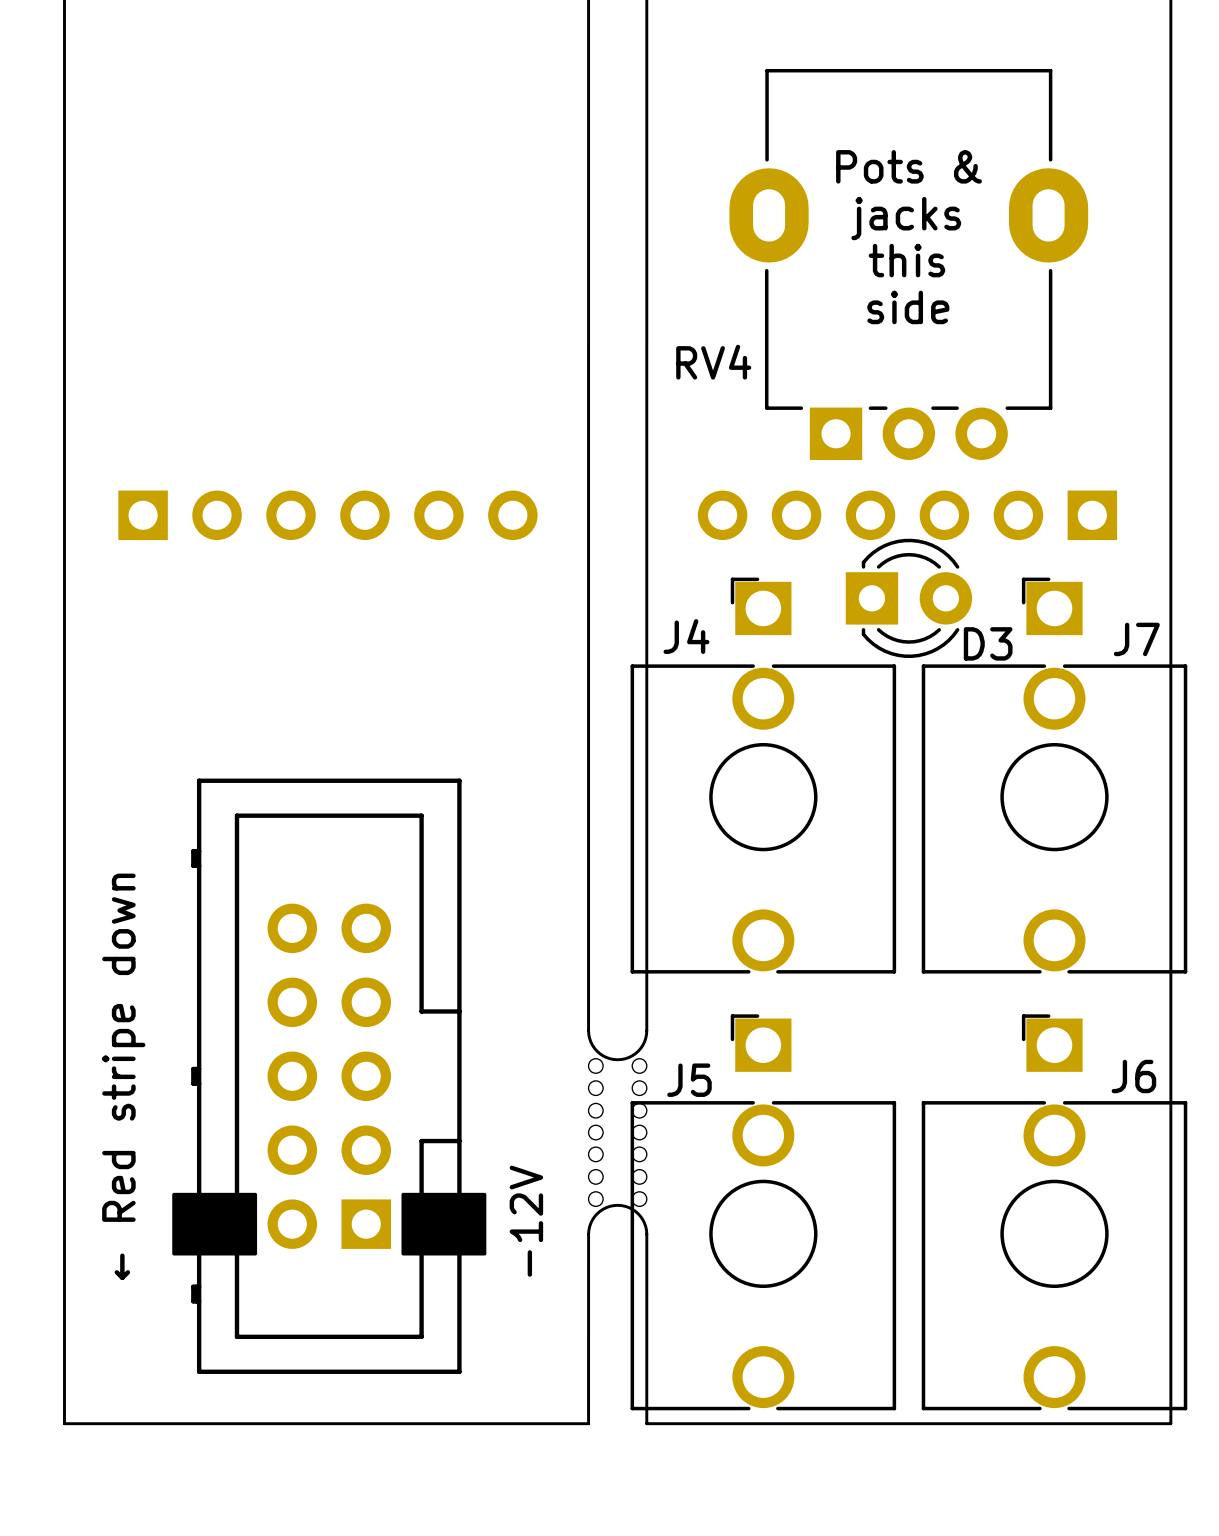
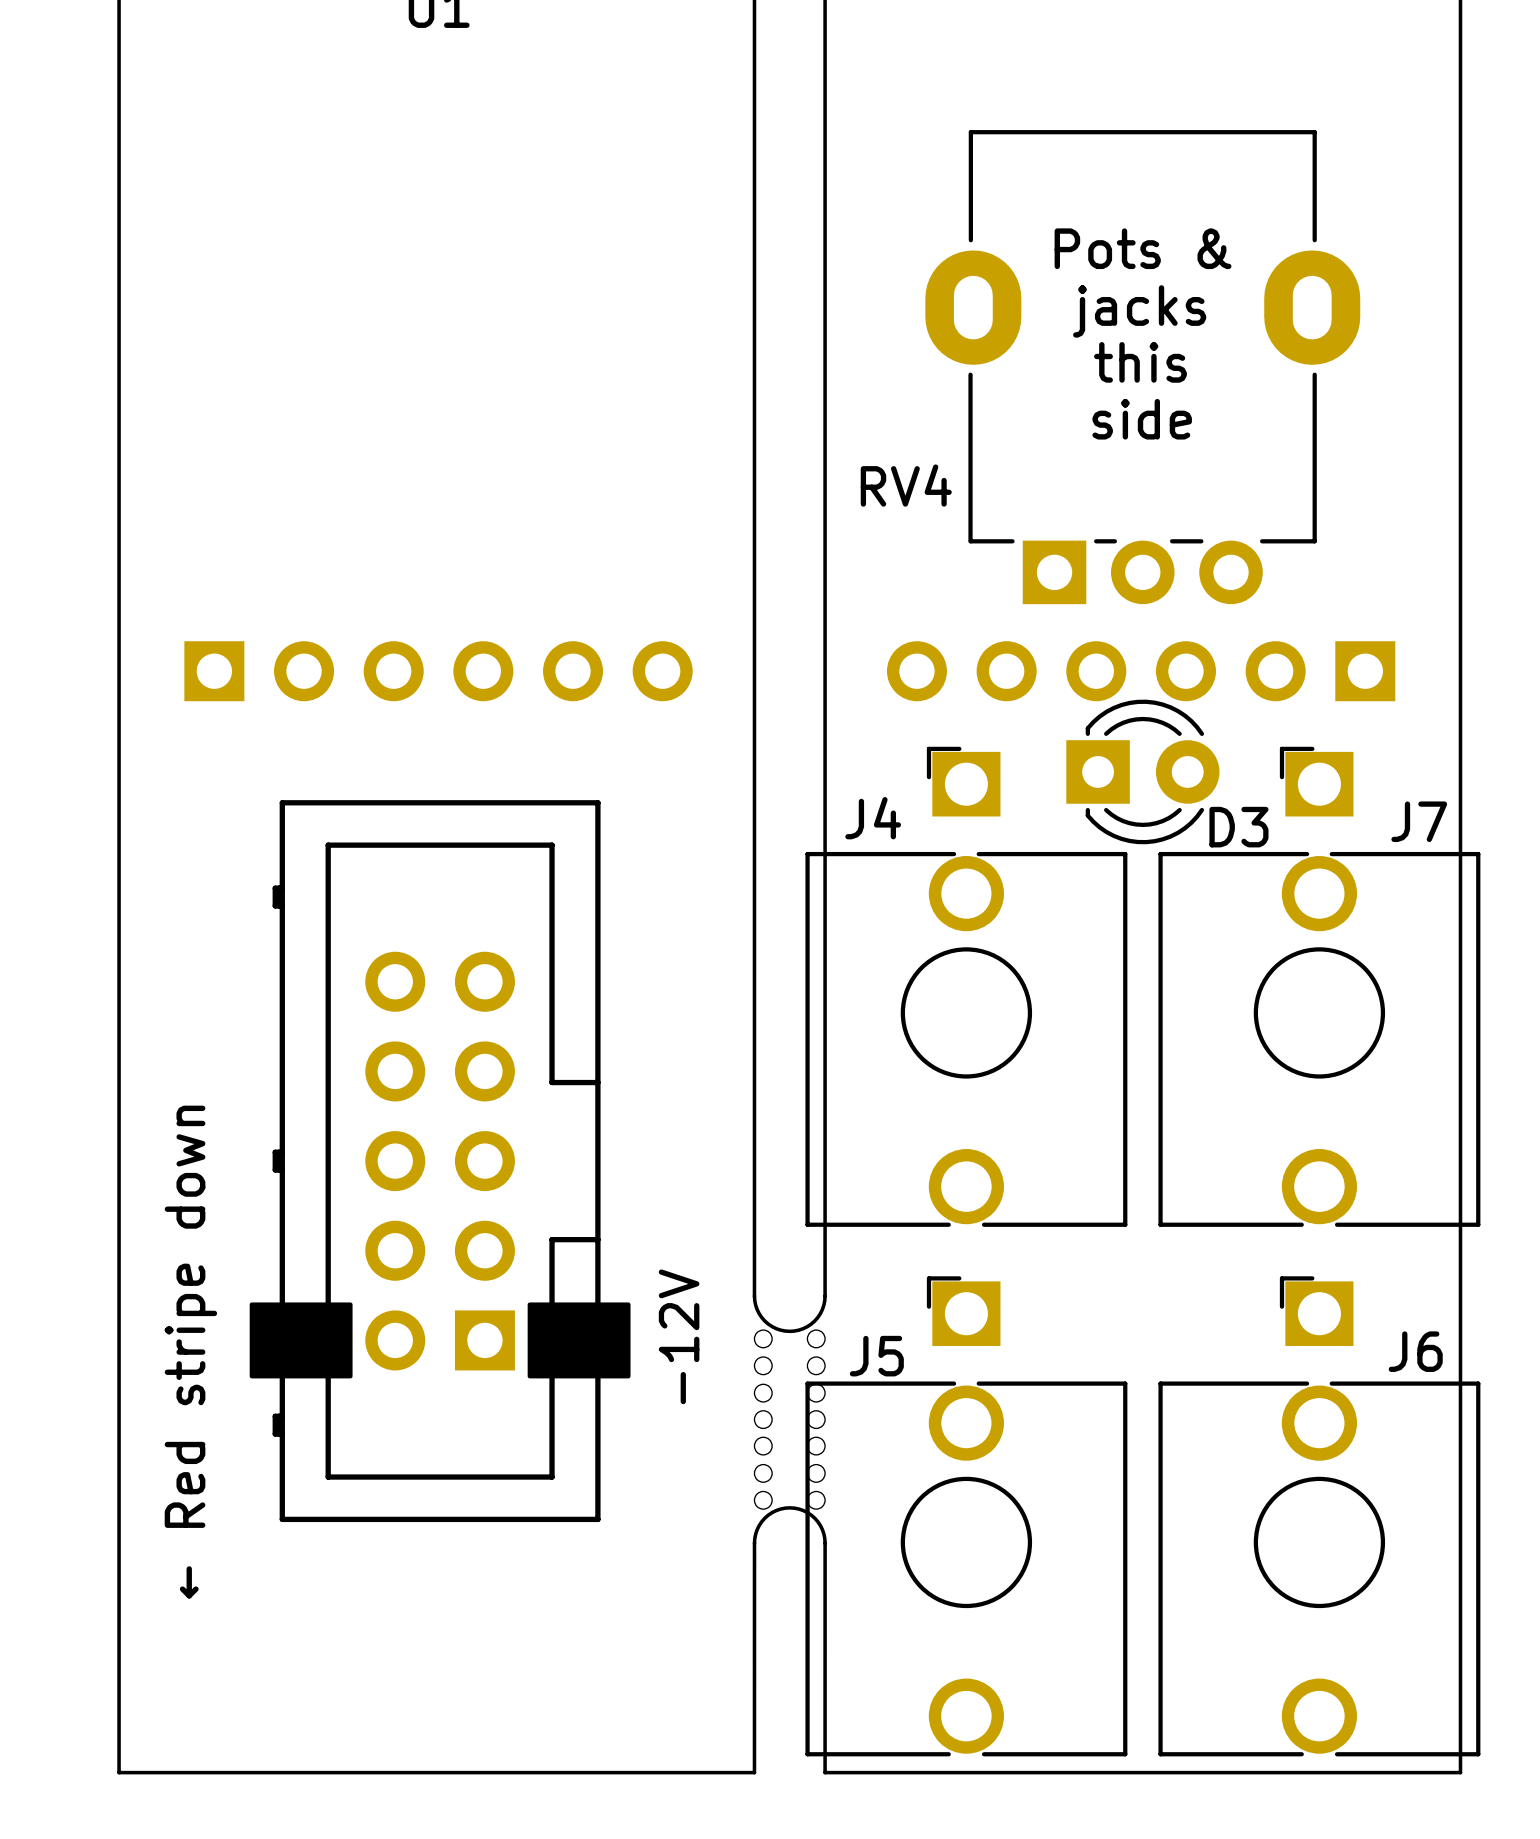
part position: (329, 1076) -> (440, 1161)

